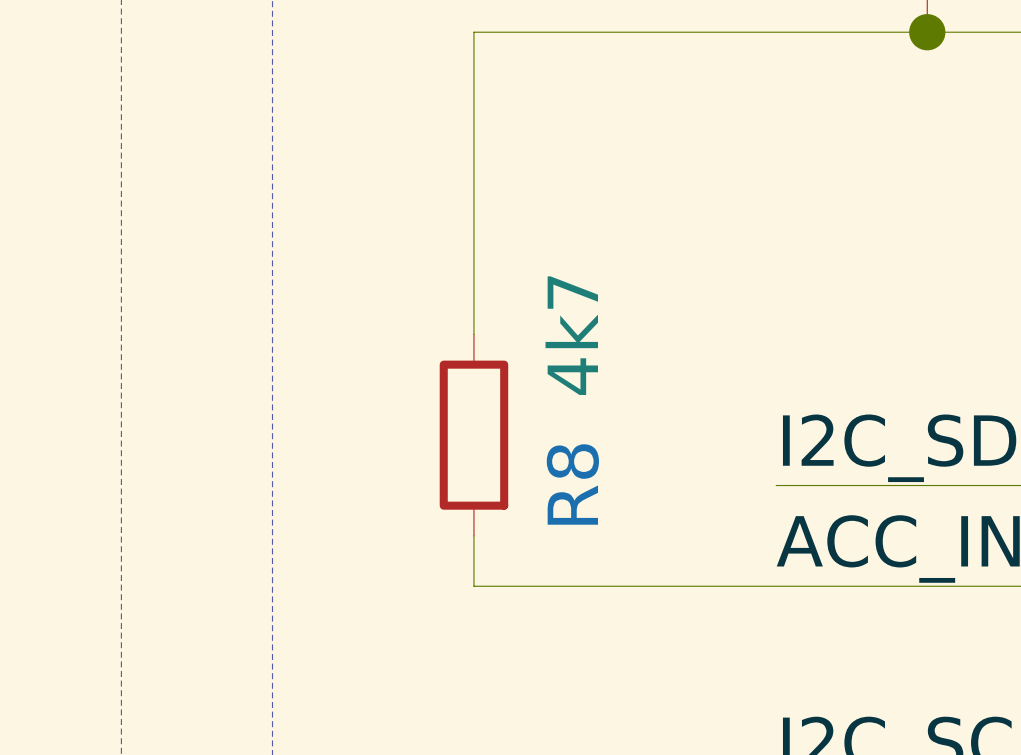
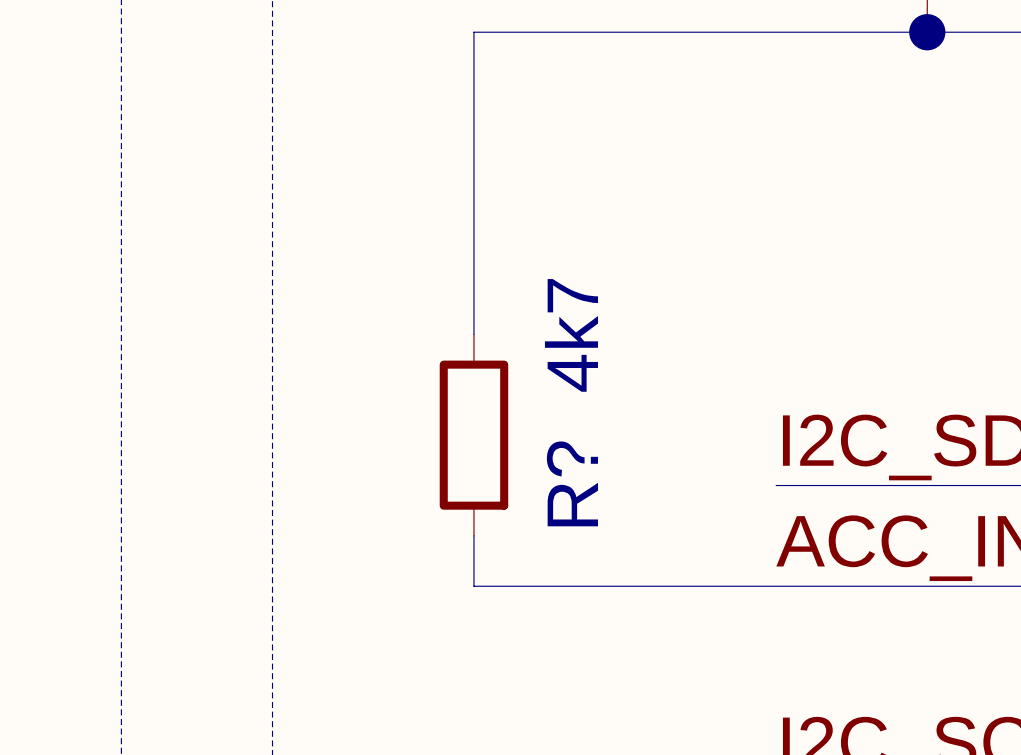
R8 name: R8 (572, 484) -> R? (572, 483)

